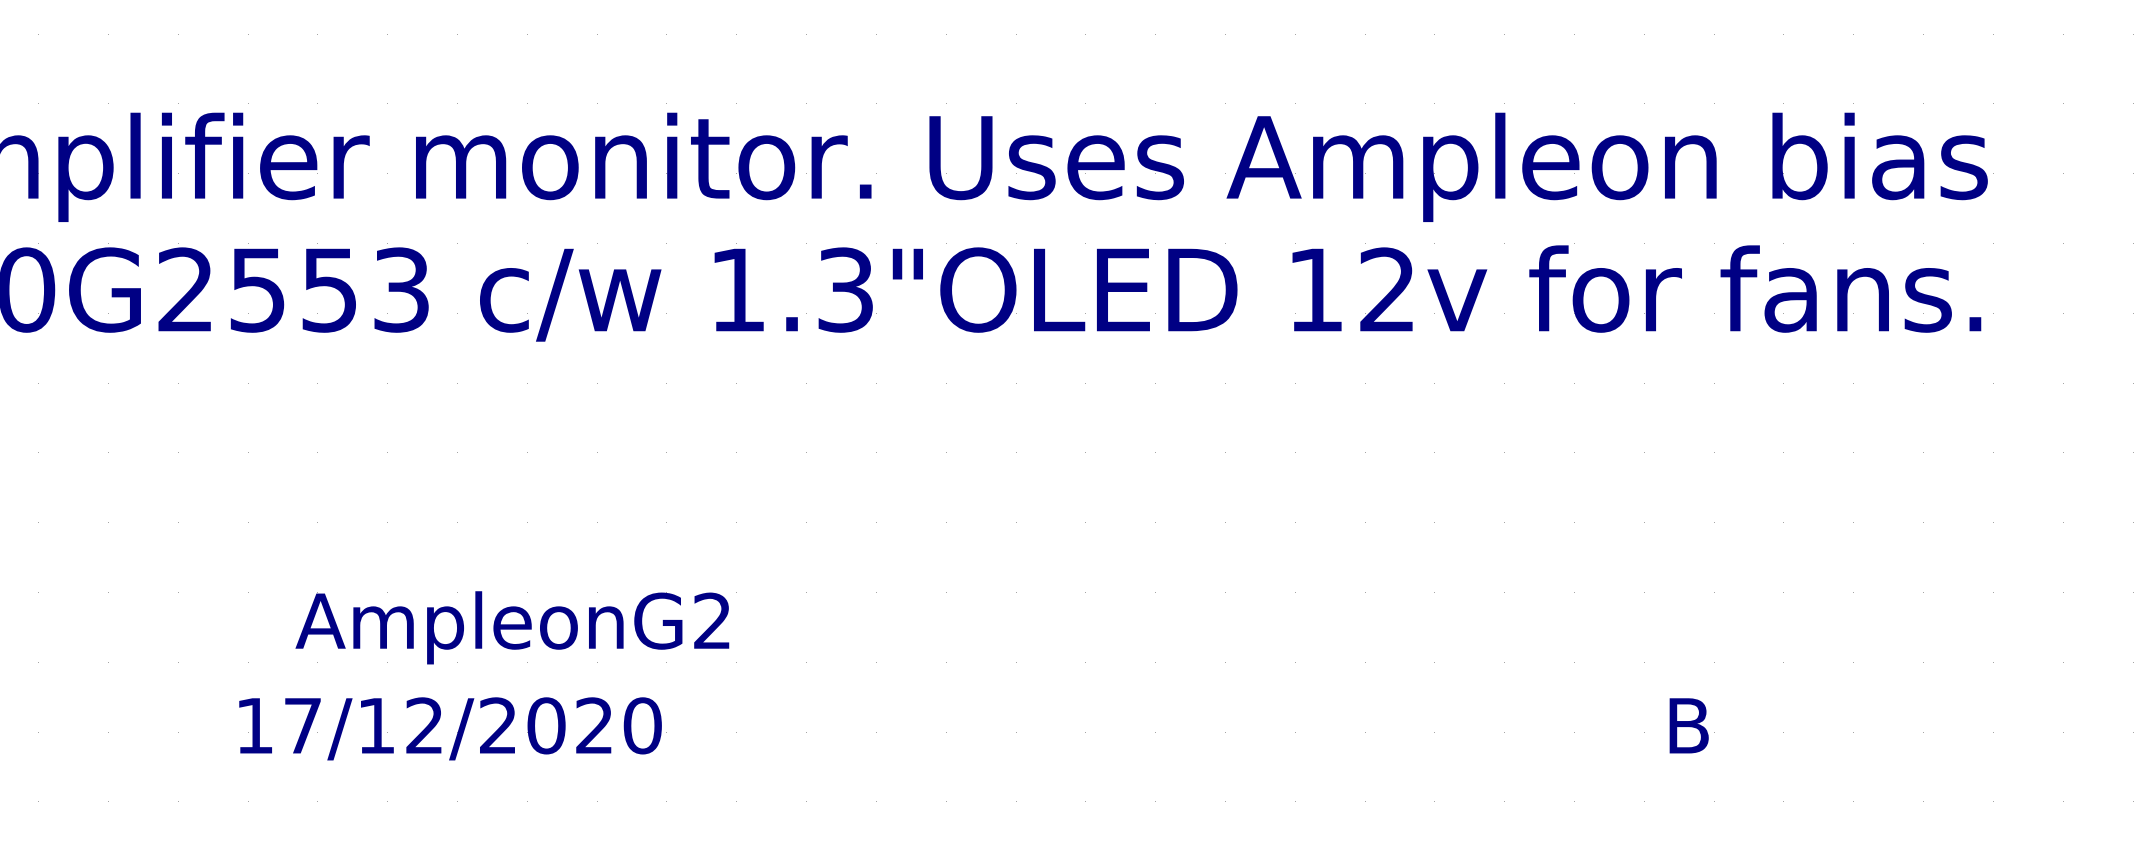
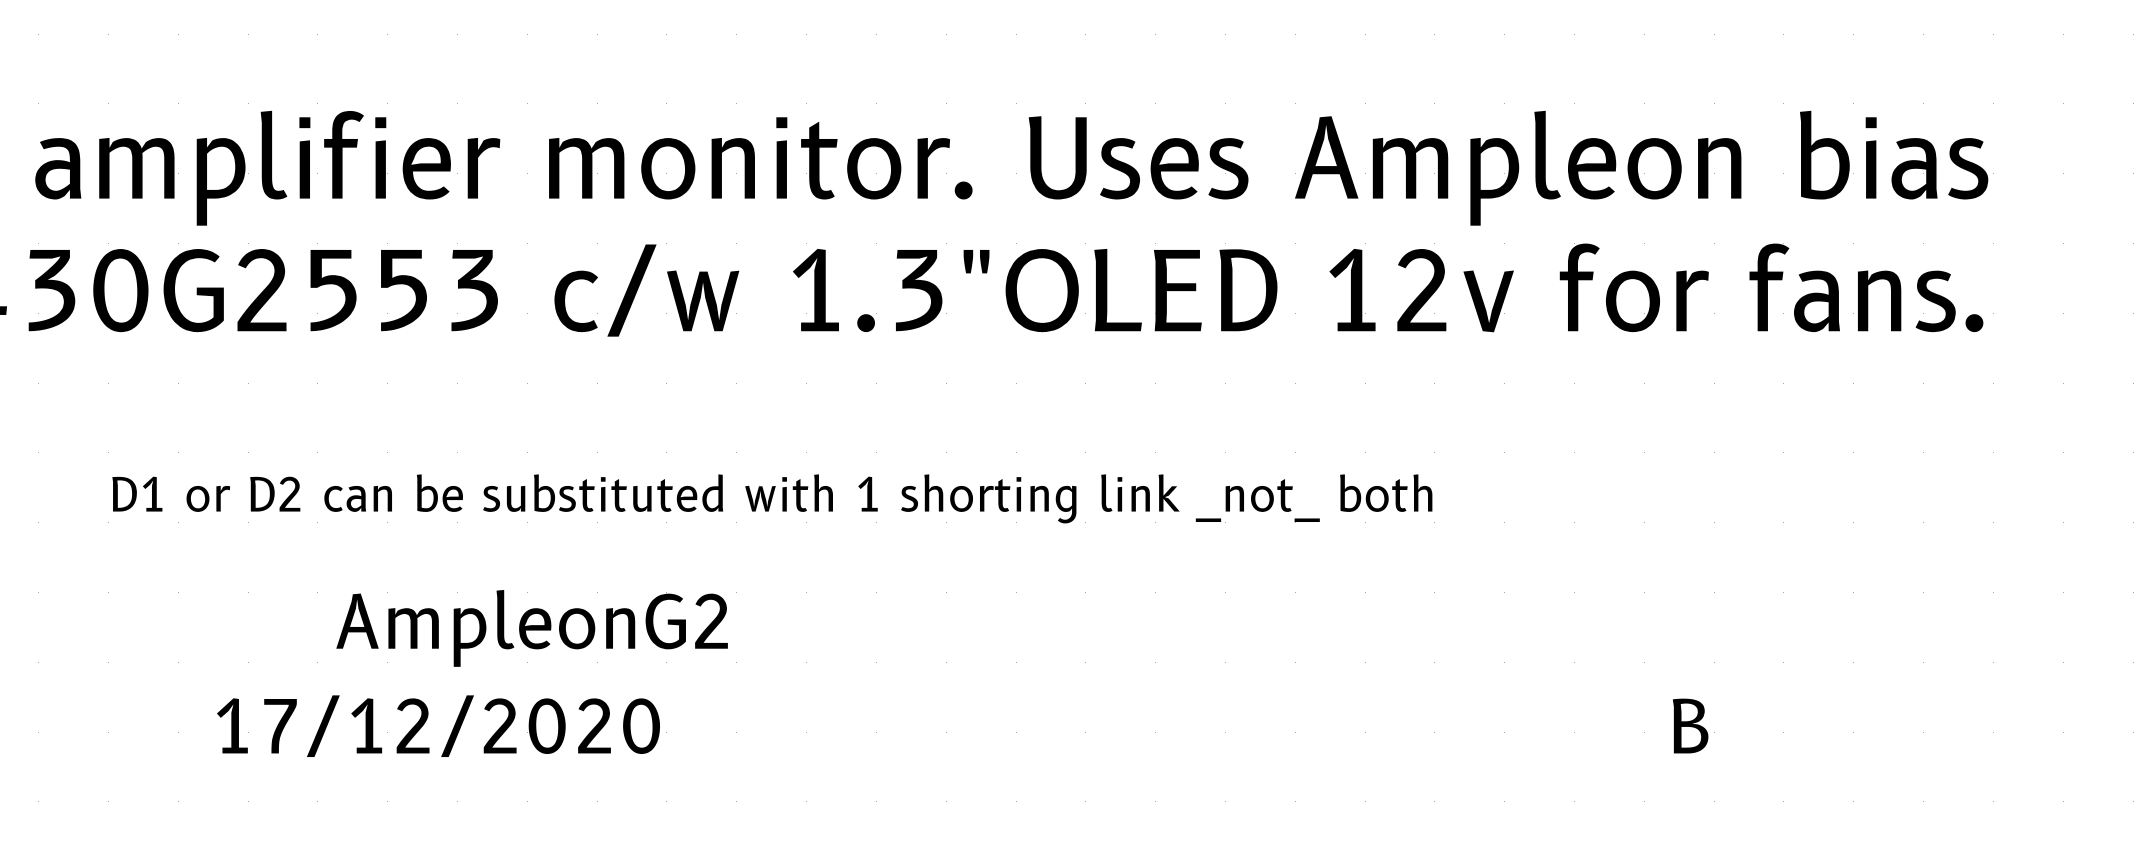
text: none -> D1 or D2 can be substituted with 1 shorting link _not_ both (772, 498)

